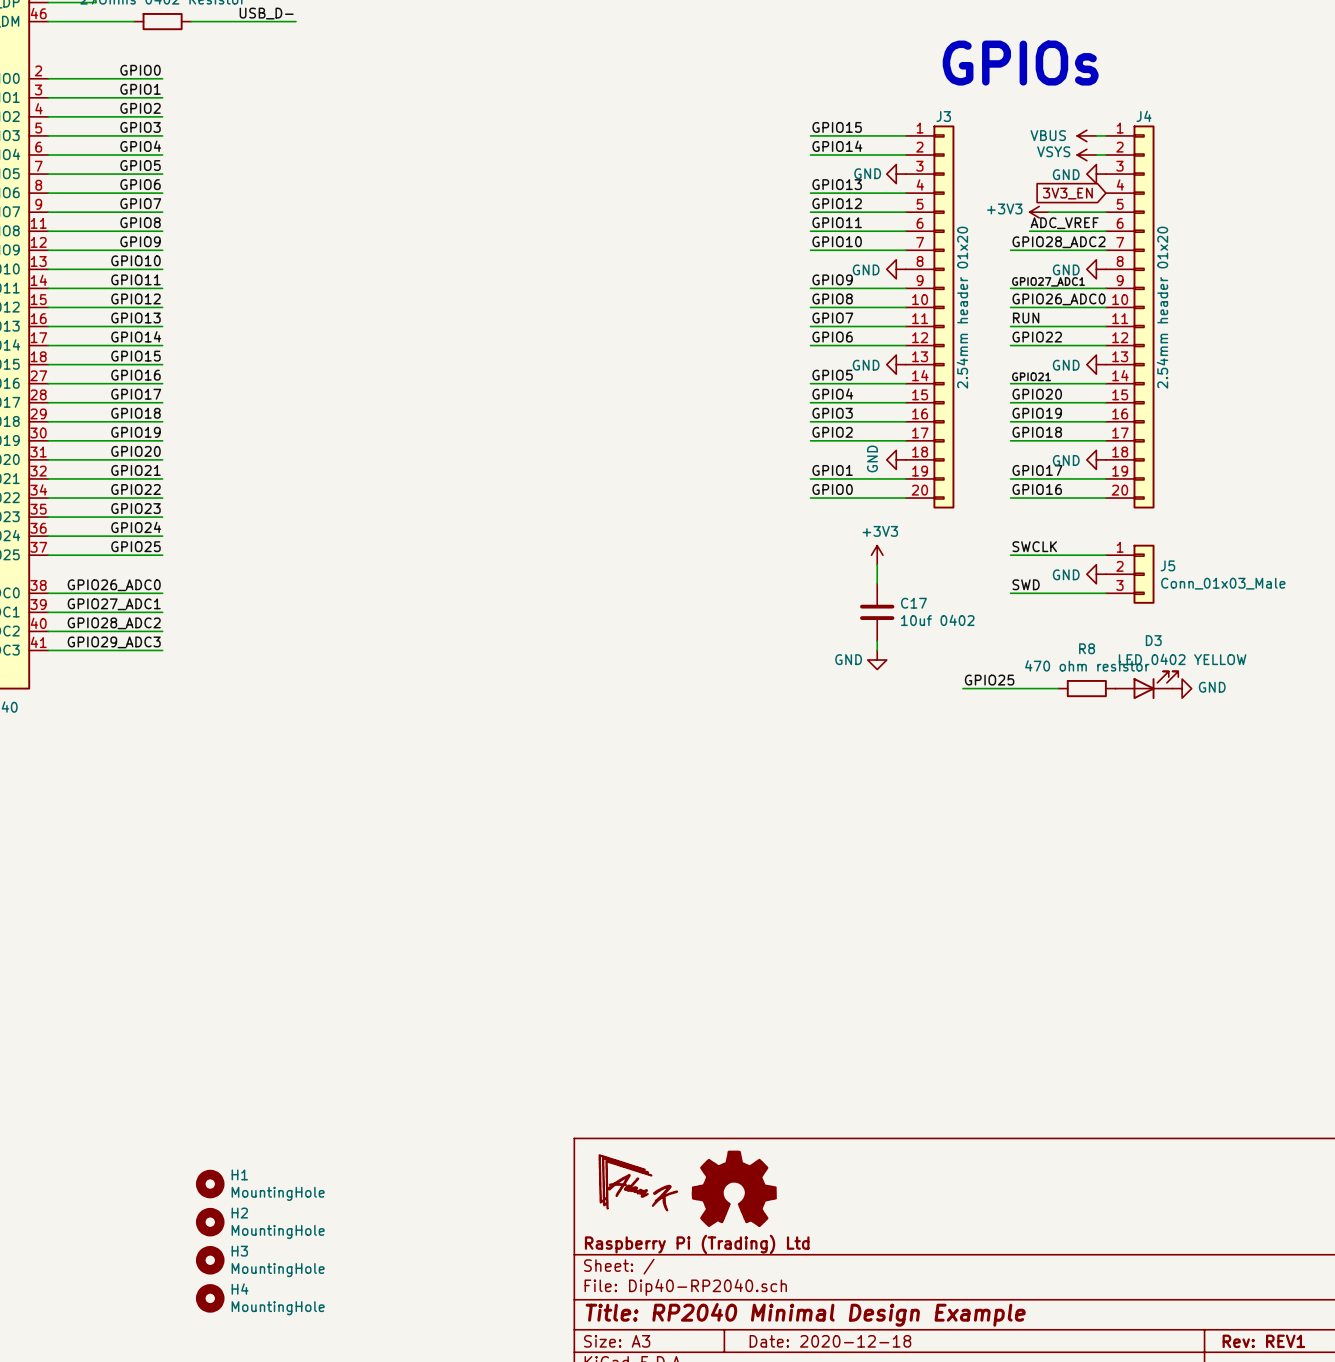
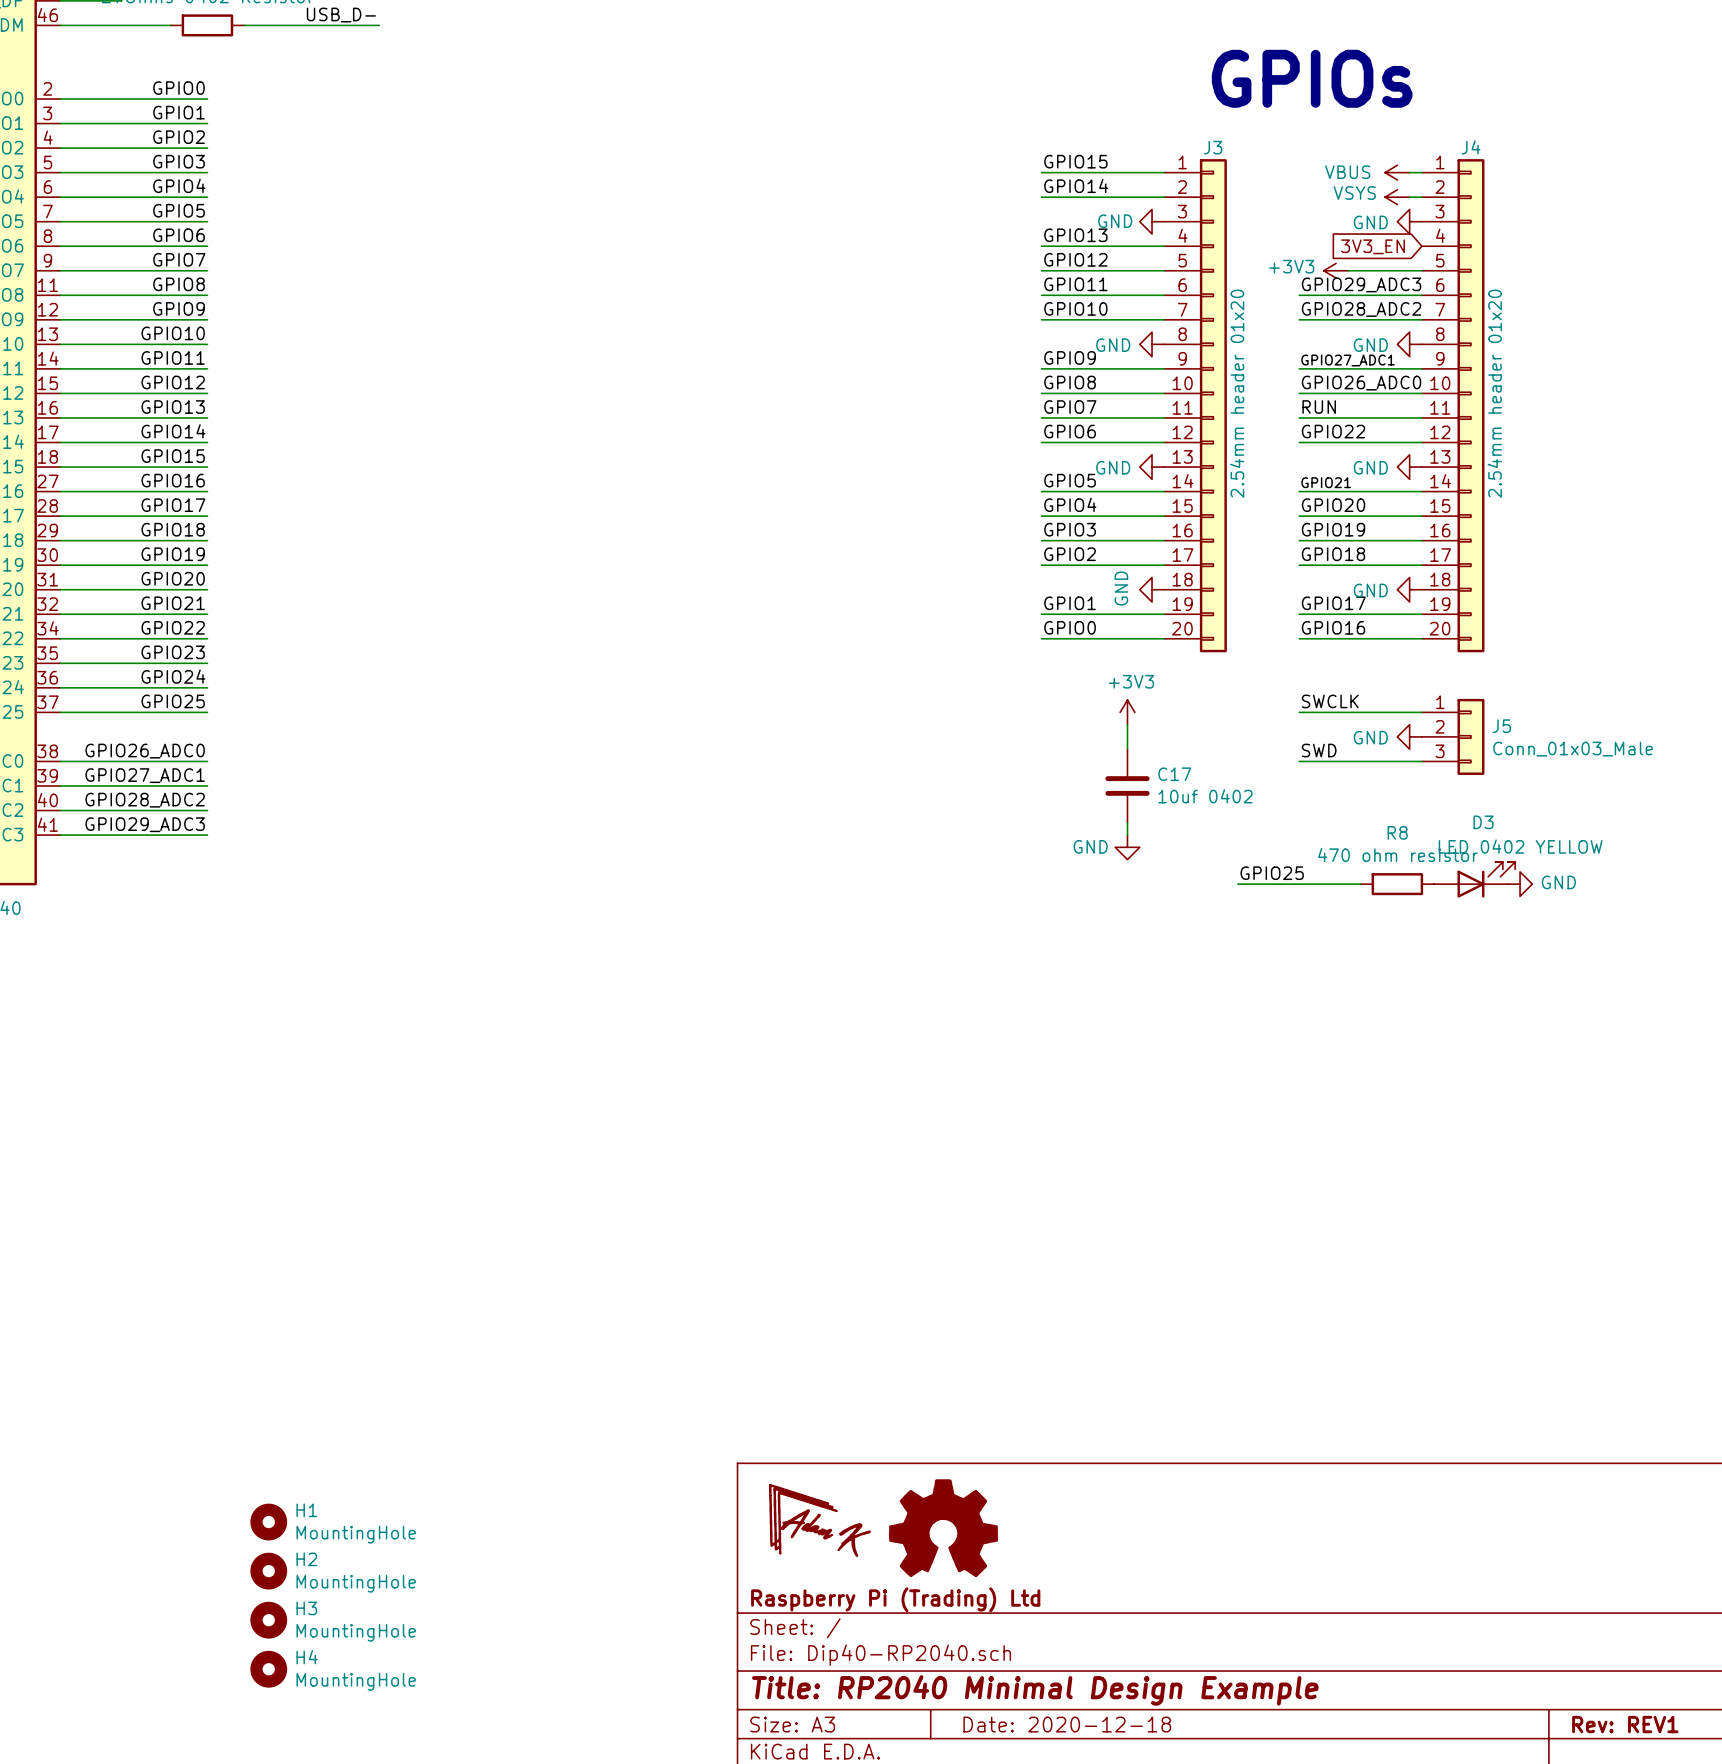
label: none -> GPIO29_ADC3 (1361, 284)
label: ADC_VREF (1064, 223) -> none
wire: none -> (1299, 295) (1323, 295)

